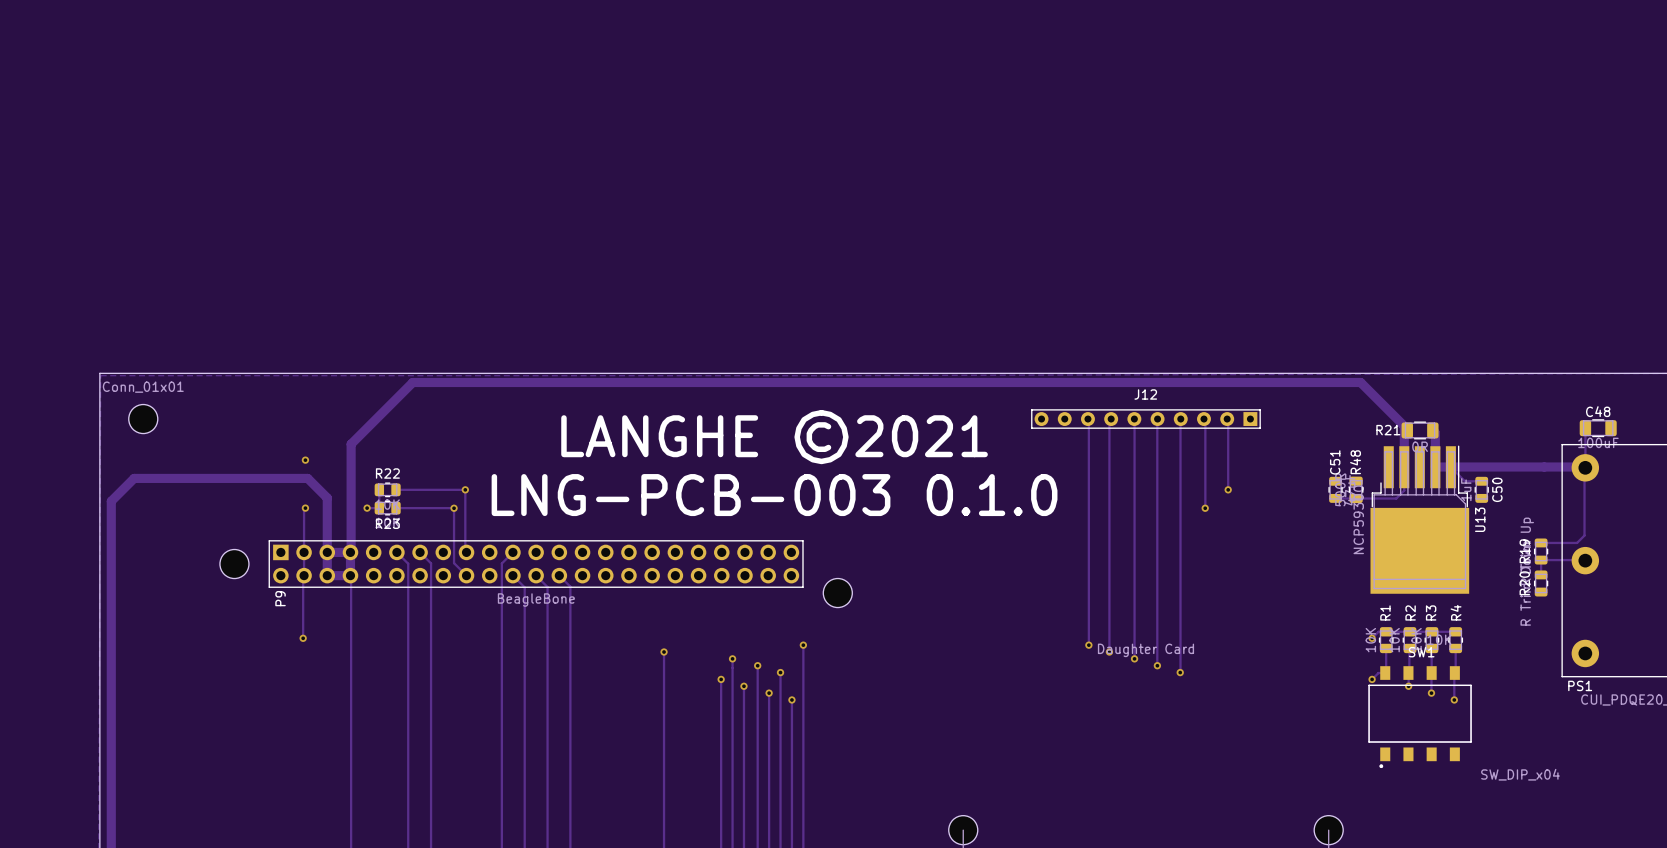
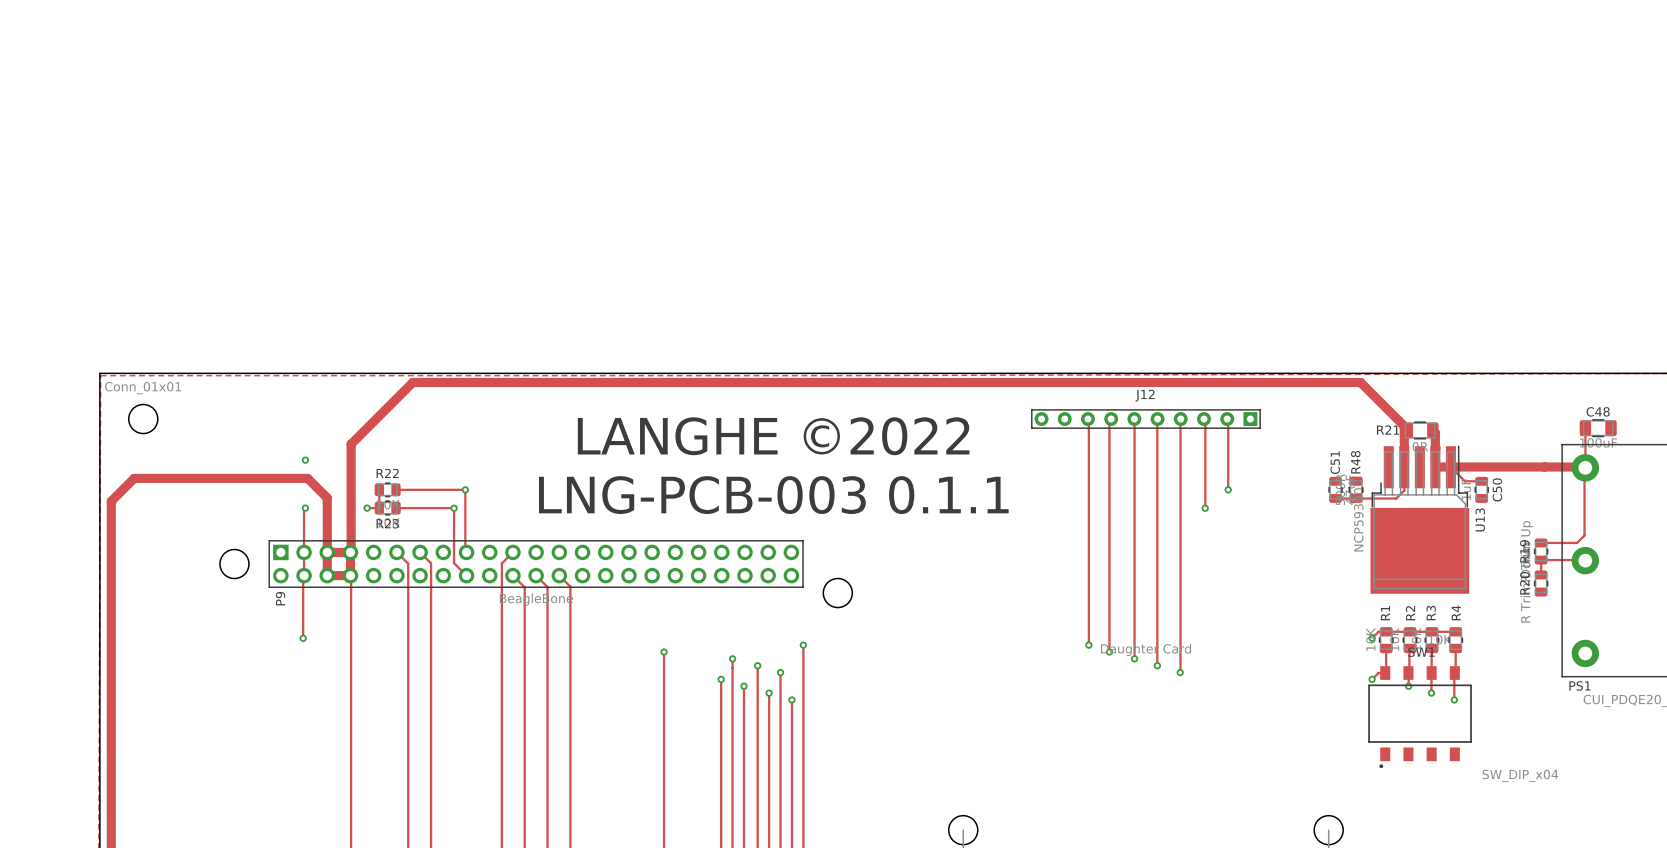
text: LANGHE ©2021 (774, 437) -> LANGHE ©2022 (773, 436)
text: LNG-PCB-003 0.1.0 (774, 495) -> LNG-PCB-003 0.1.1 (773, 495)

